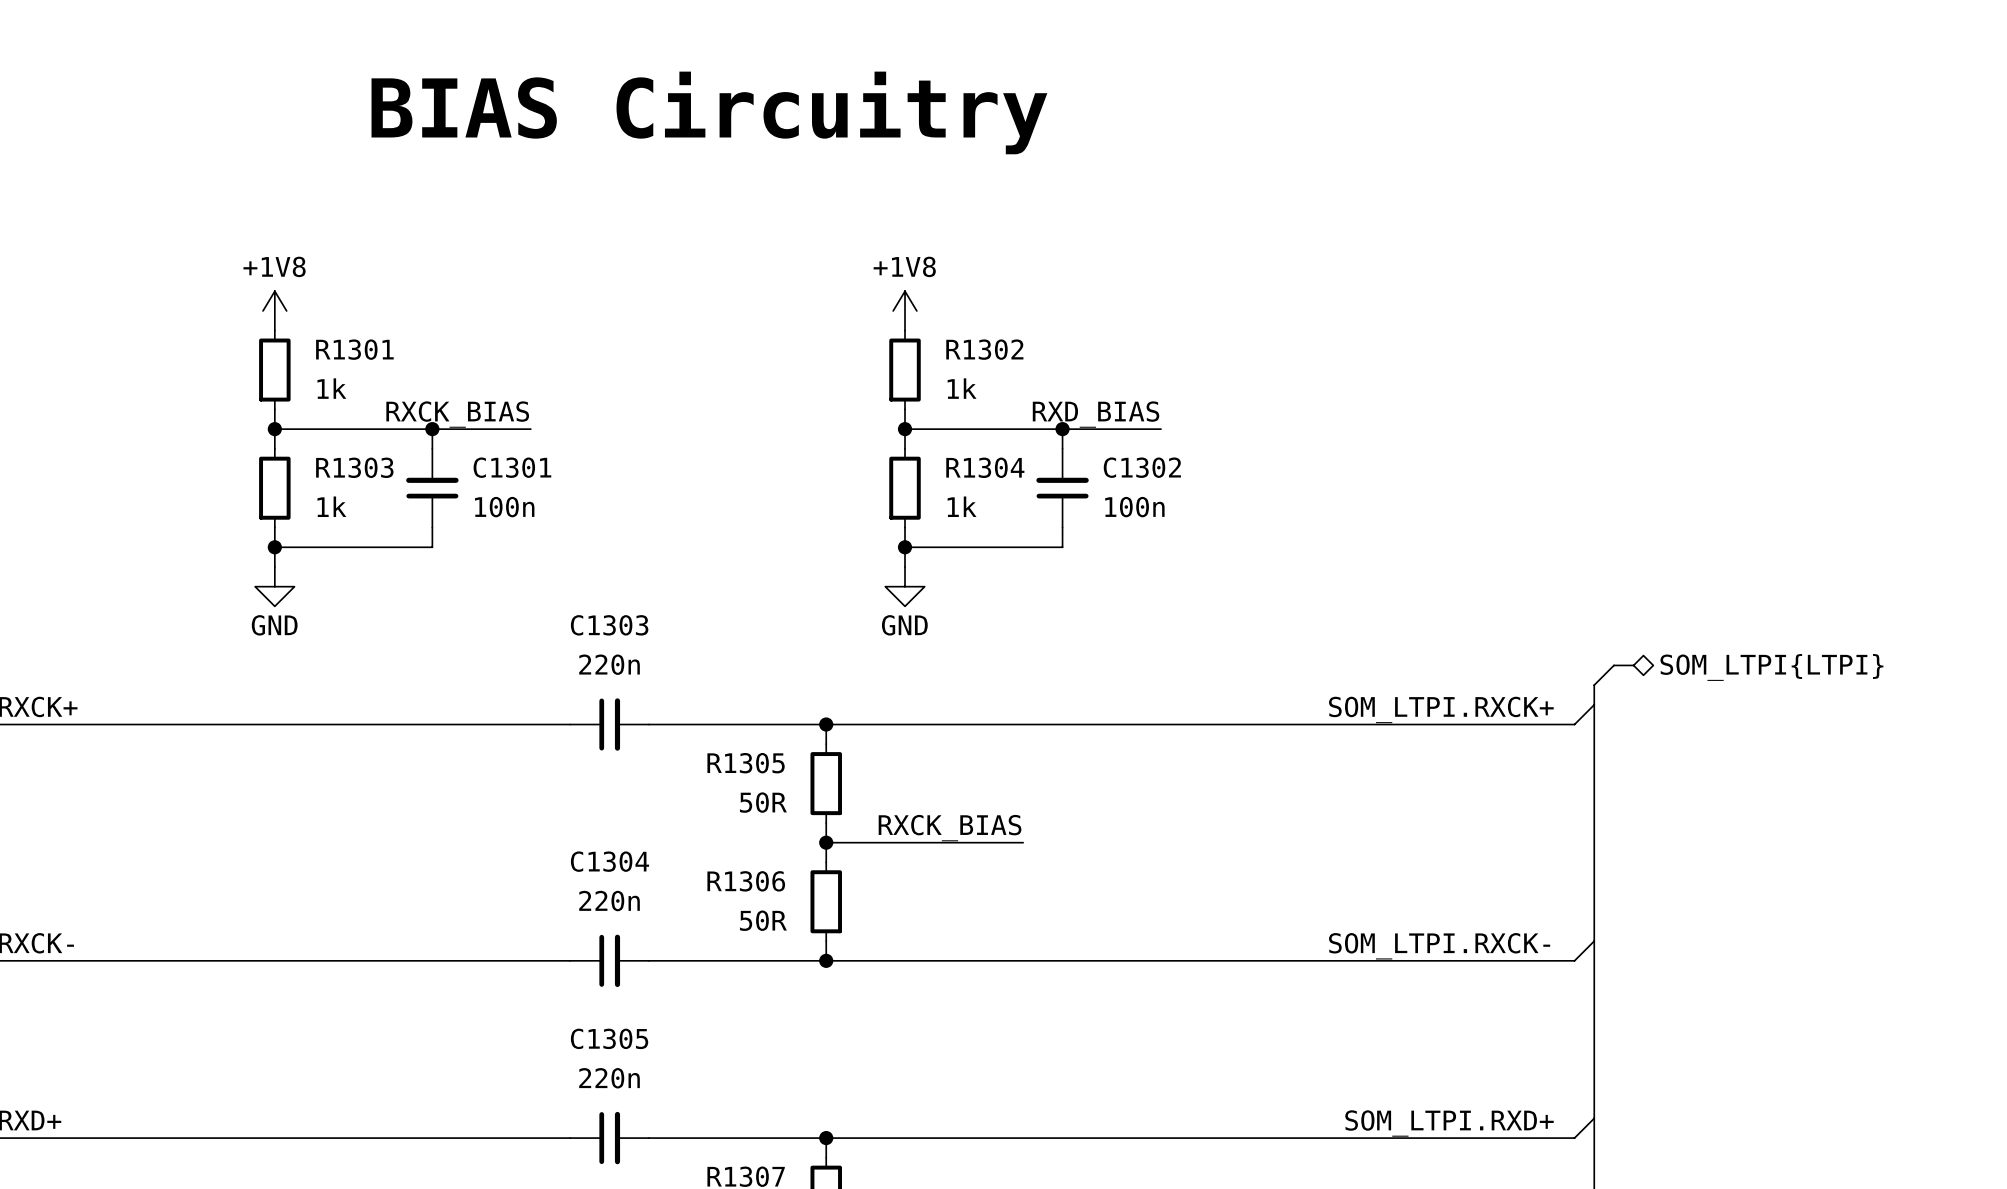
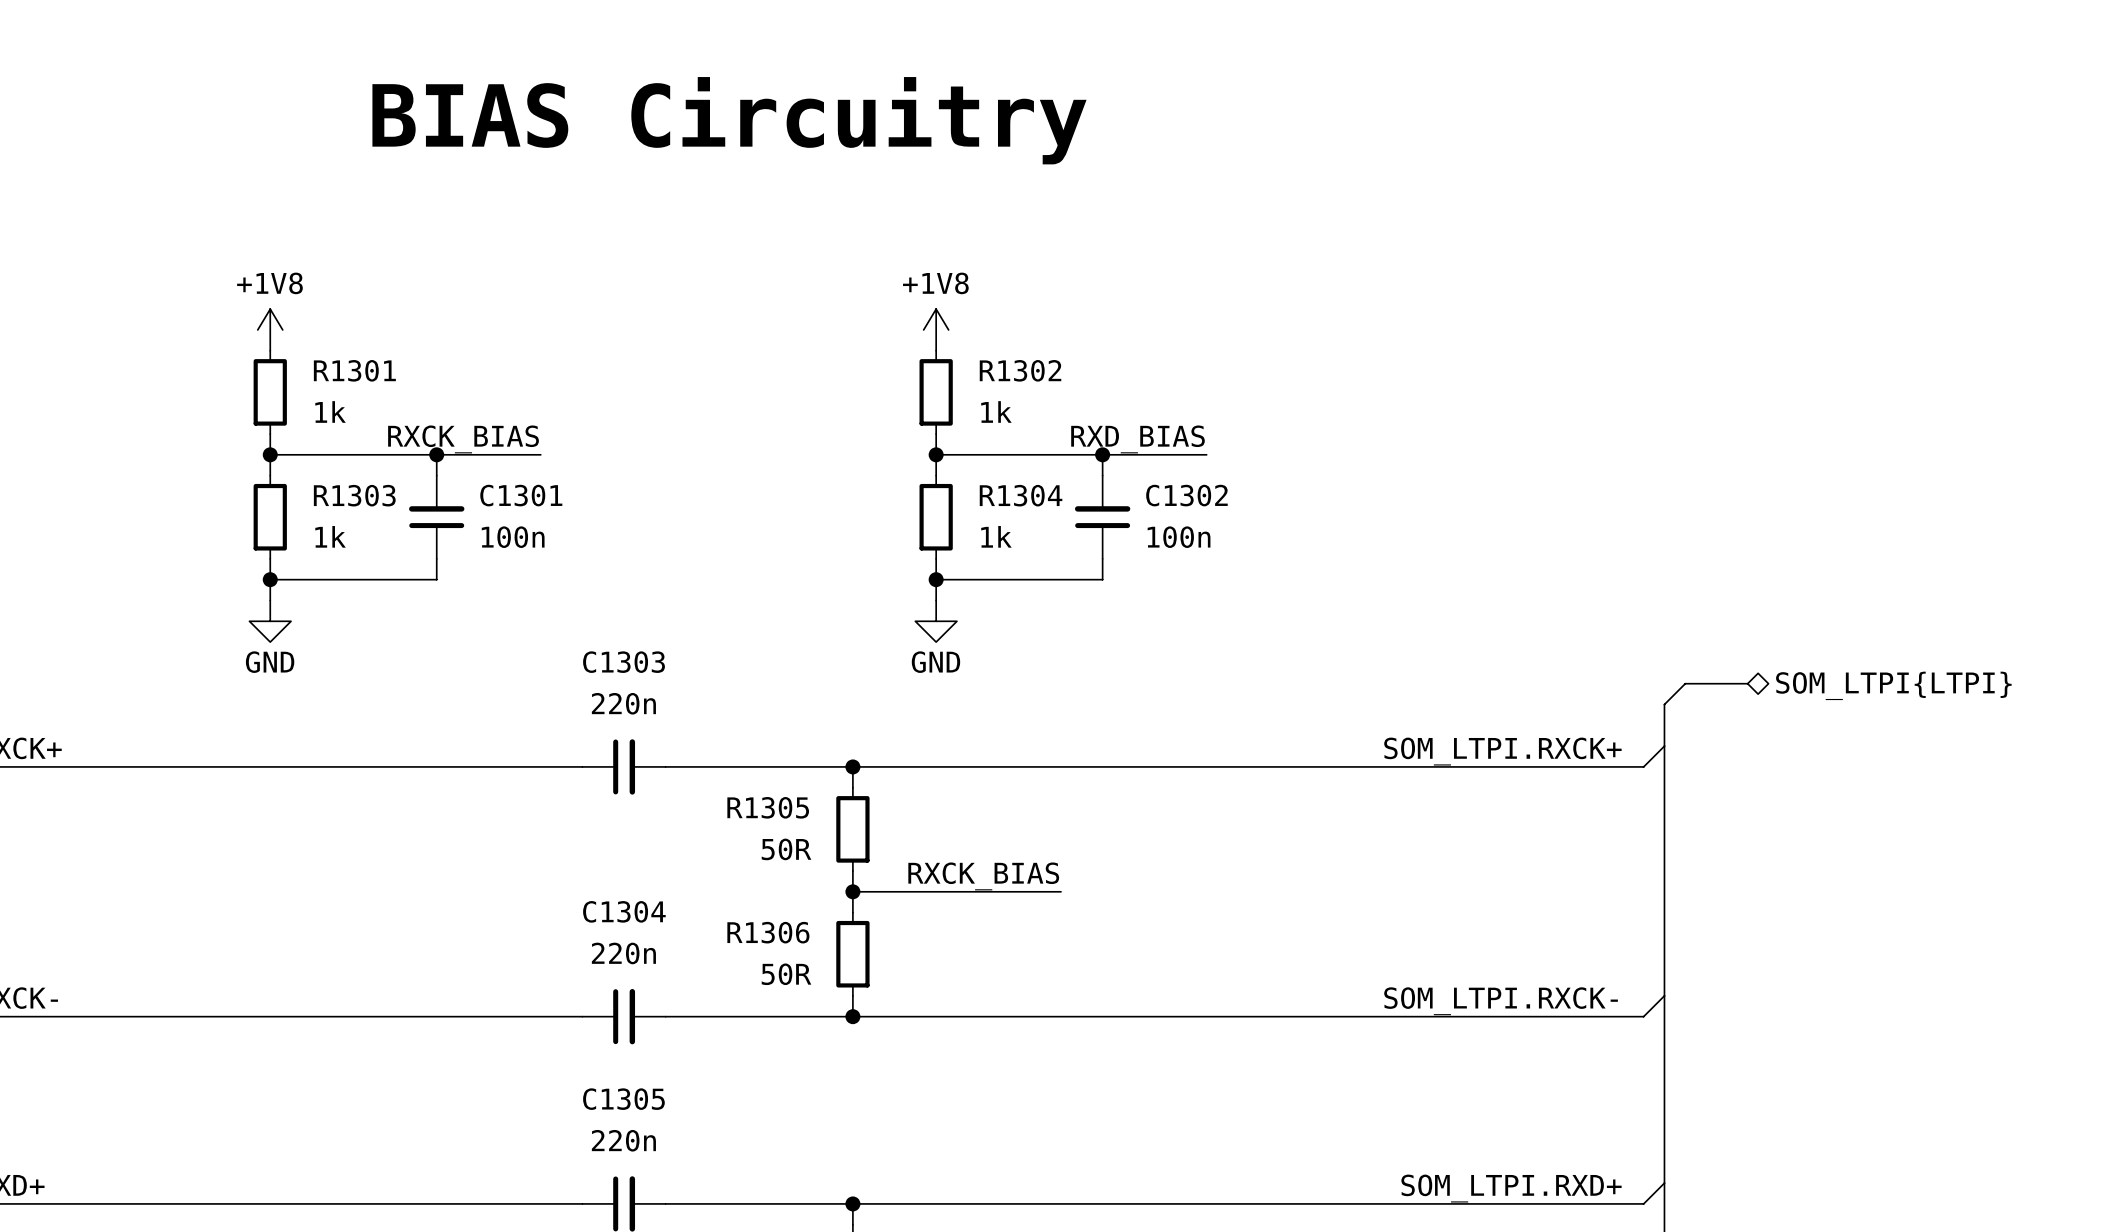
bus: (1633, 665) (1613, 665) (1594, 685) -> (1747, 683) (1685, 683) (1664, 704) (1664, 725)
hierarchical label position: SOM_LTPI{LTPI} (1771, 667) -> SOM_LTPI{LTPI} (1893, 685)

